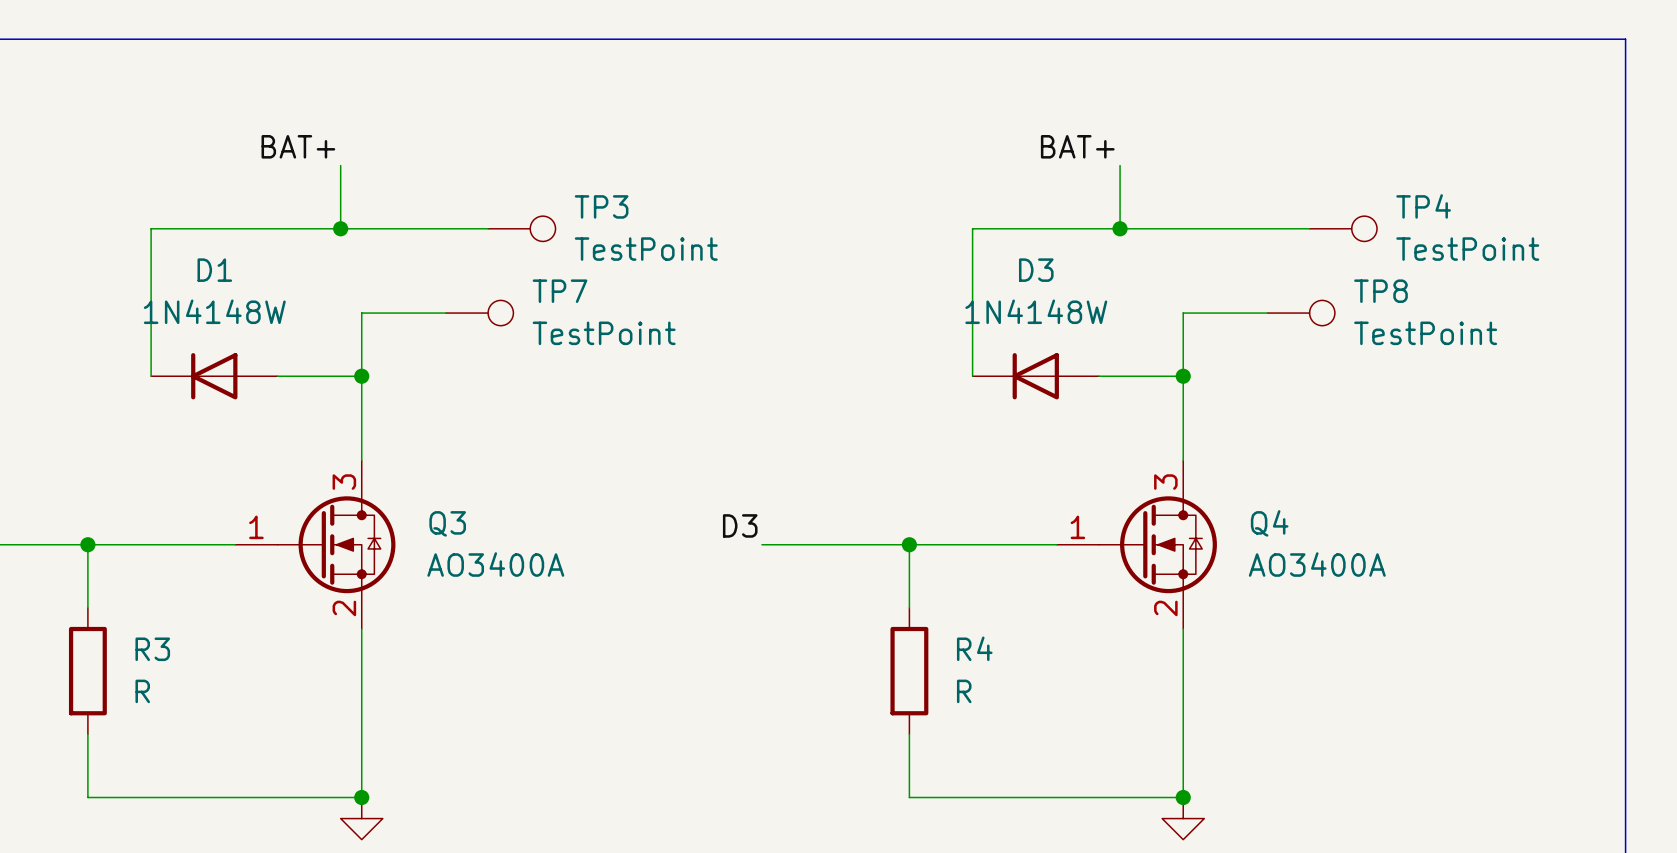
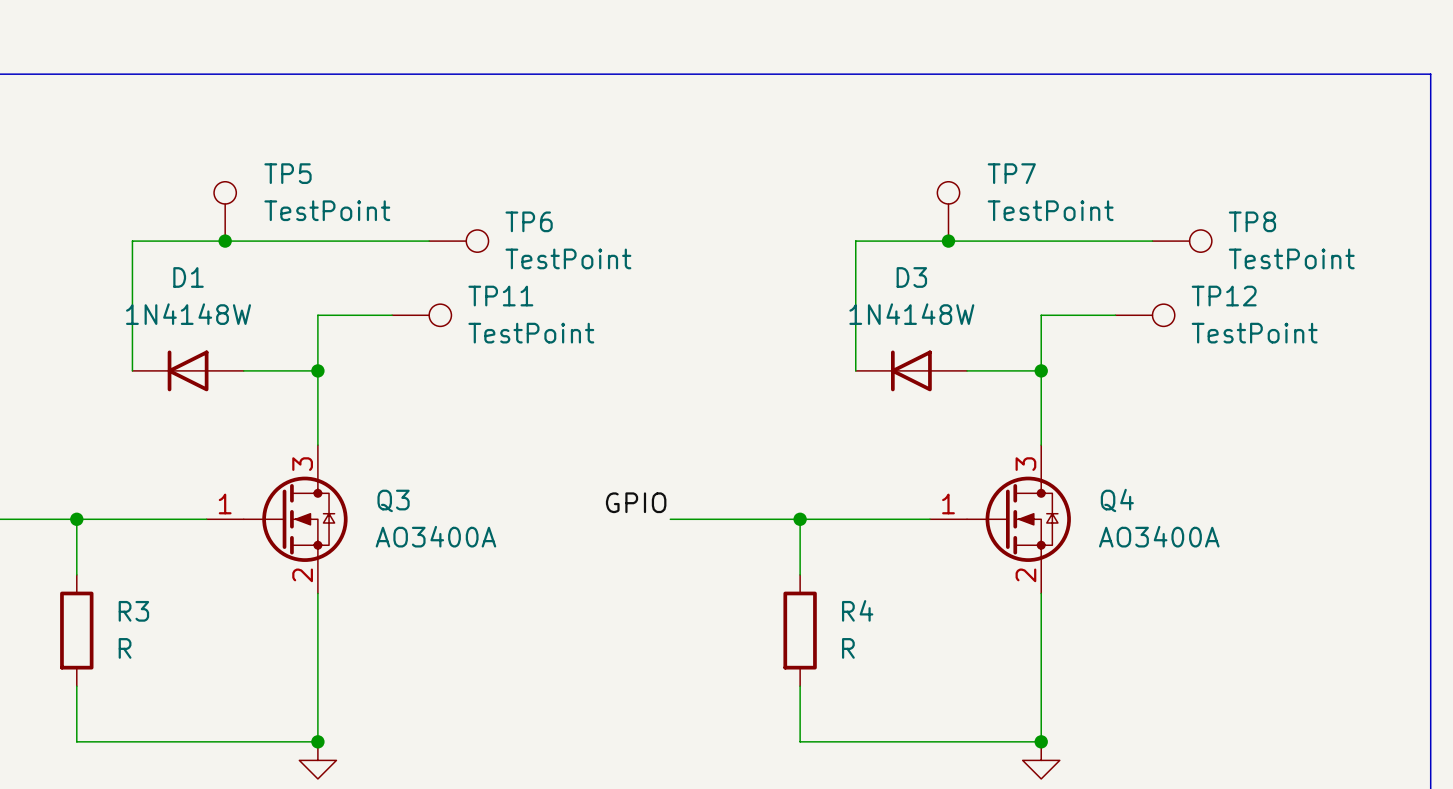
label: BAT+ (298, 146) -> none
label: BAT+ (1077, 146) -> none
wire: (340, 165) (340, 228) -> none
wire: (1120, 165) (1120, 228) -> none
TP5: none -> TestPoint (225, 211)
TP7: none -> TestPoint (948, 211)
TP3 name: TP3 (601, 206) -> TP6 (529, 221)
TP4 name: TP4 (1423, 206) -> TP8 (1252, 221)
junction position: (340, 228) -> (225, 241)
junction position: (1120, 228) -> (948, 241)
TP7 name: TP7 (560, 291) -> TP11 (500, 296)
TP8 name: TP8 (1380, 291) -> TP12 (1224, 296)
label: D3 (740, 525) -> GPIO (636, 502)

